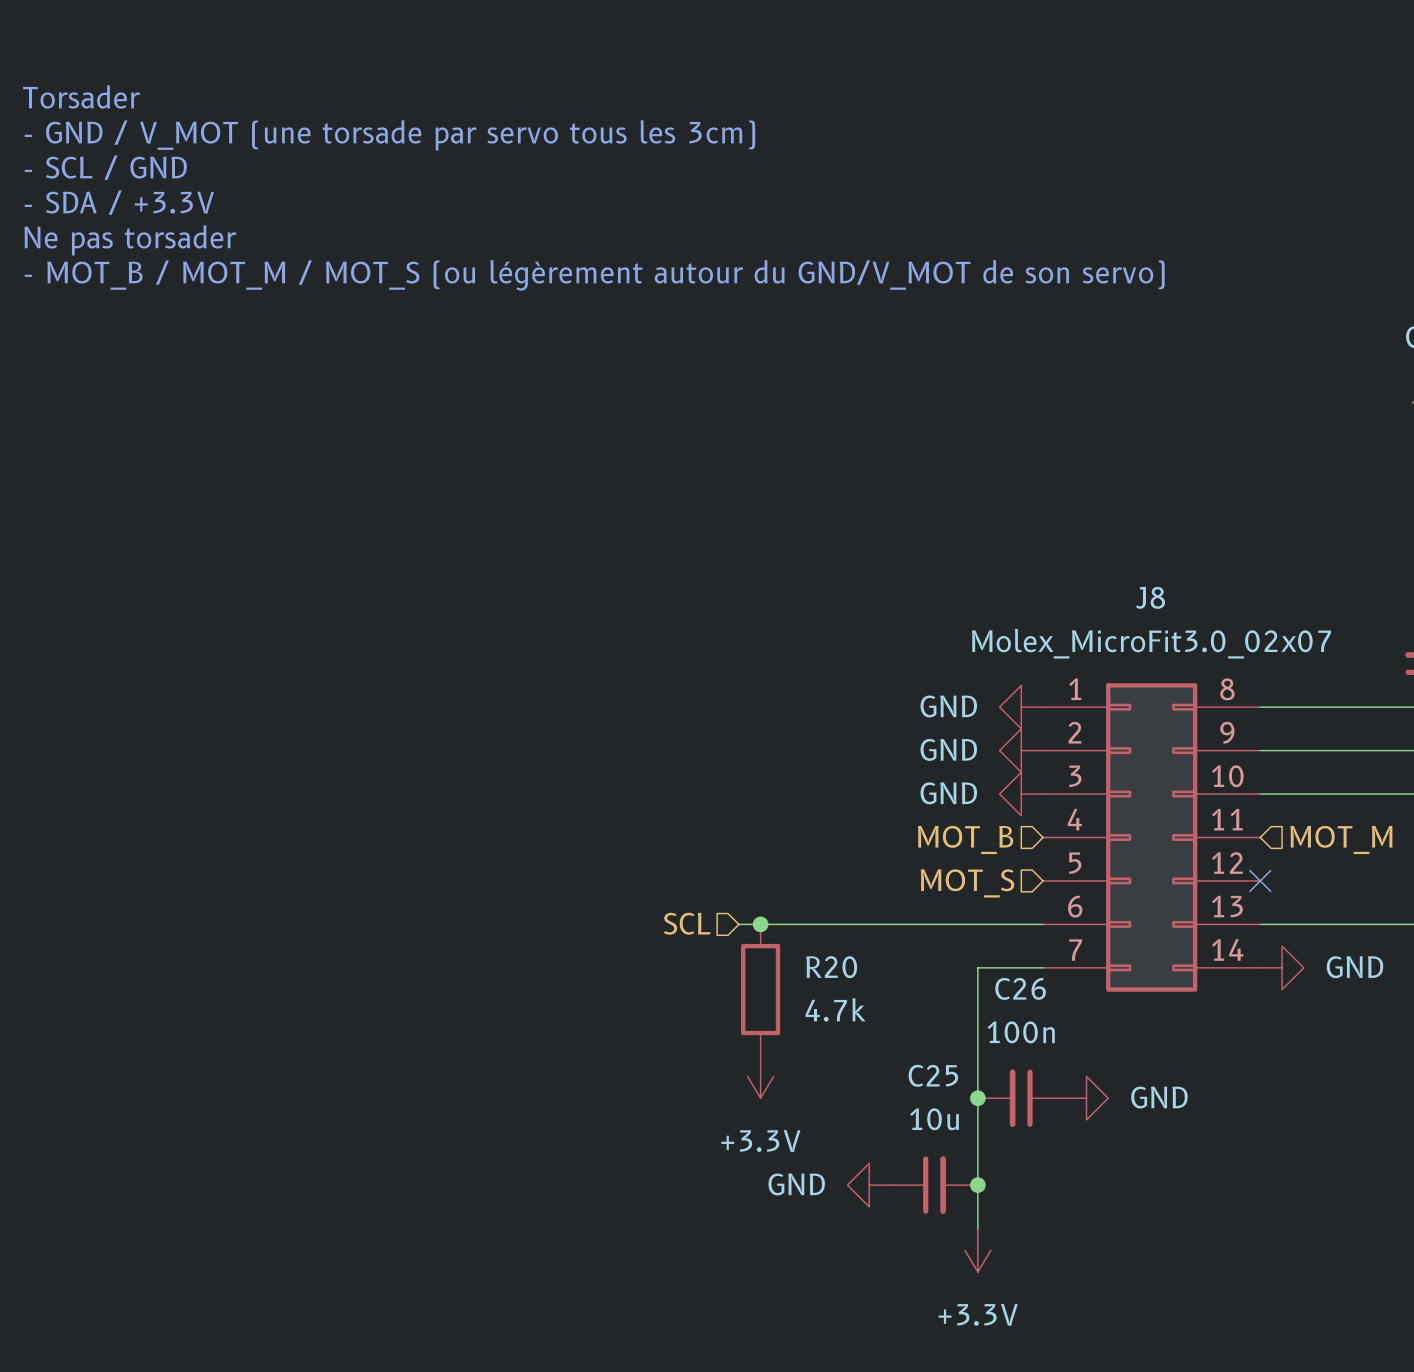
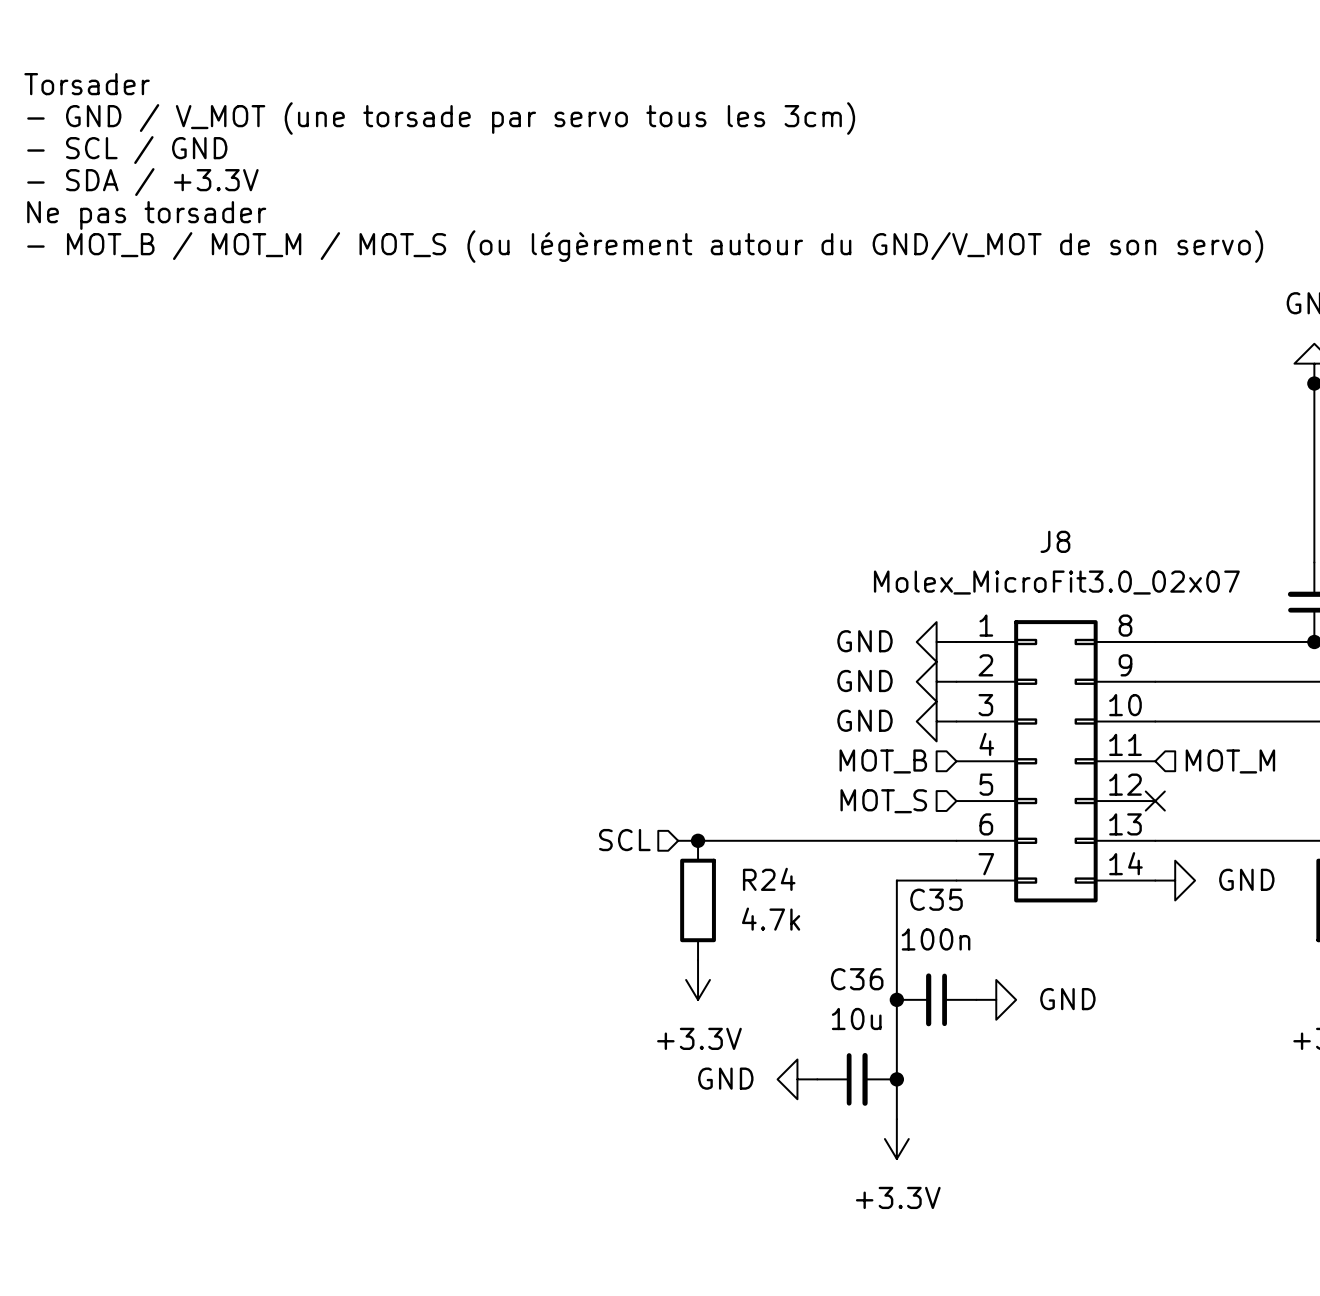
R20 name: R20 (831, 967) -> R24 (769, 879)
C26 name: C26 (1020, 988) -> C35 (936, 899)
C25 name: C25 (933, 1075) -> C36 (857, 979)

